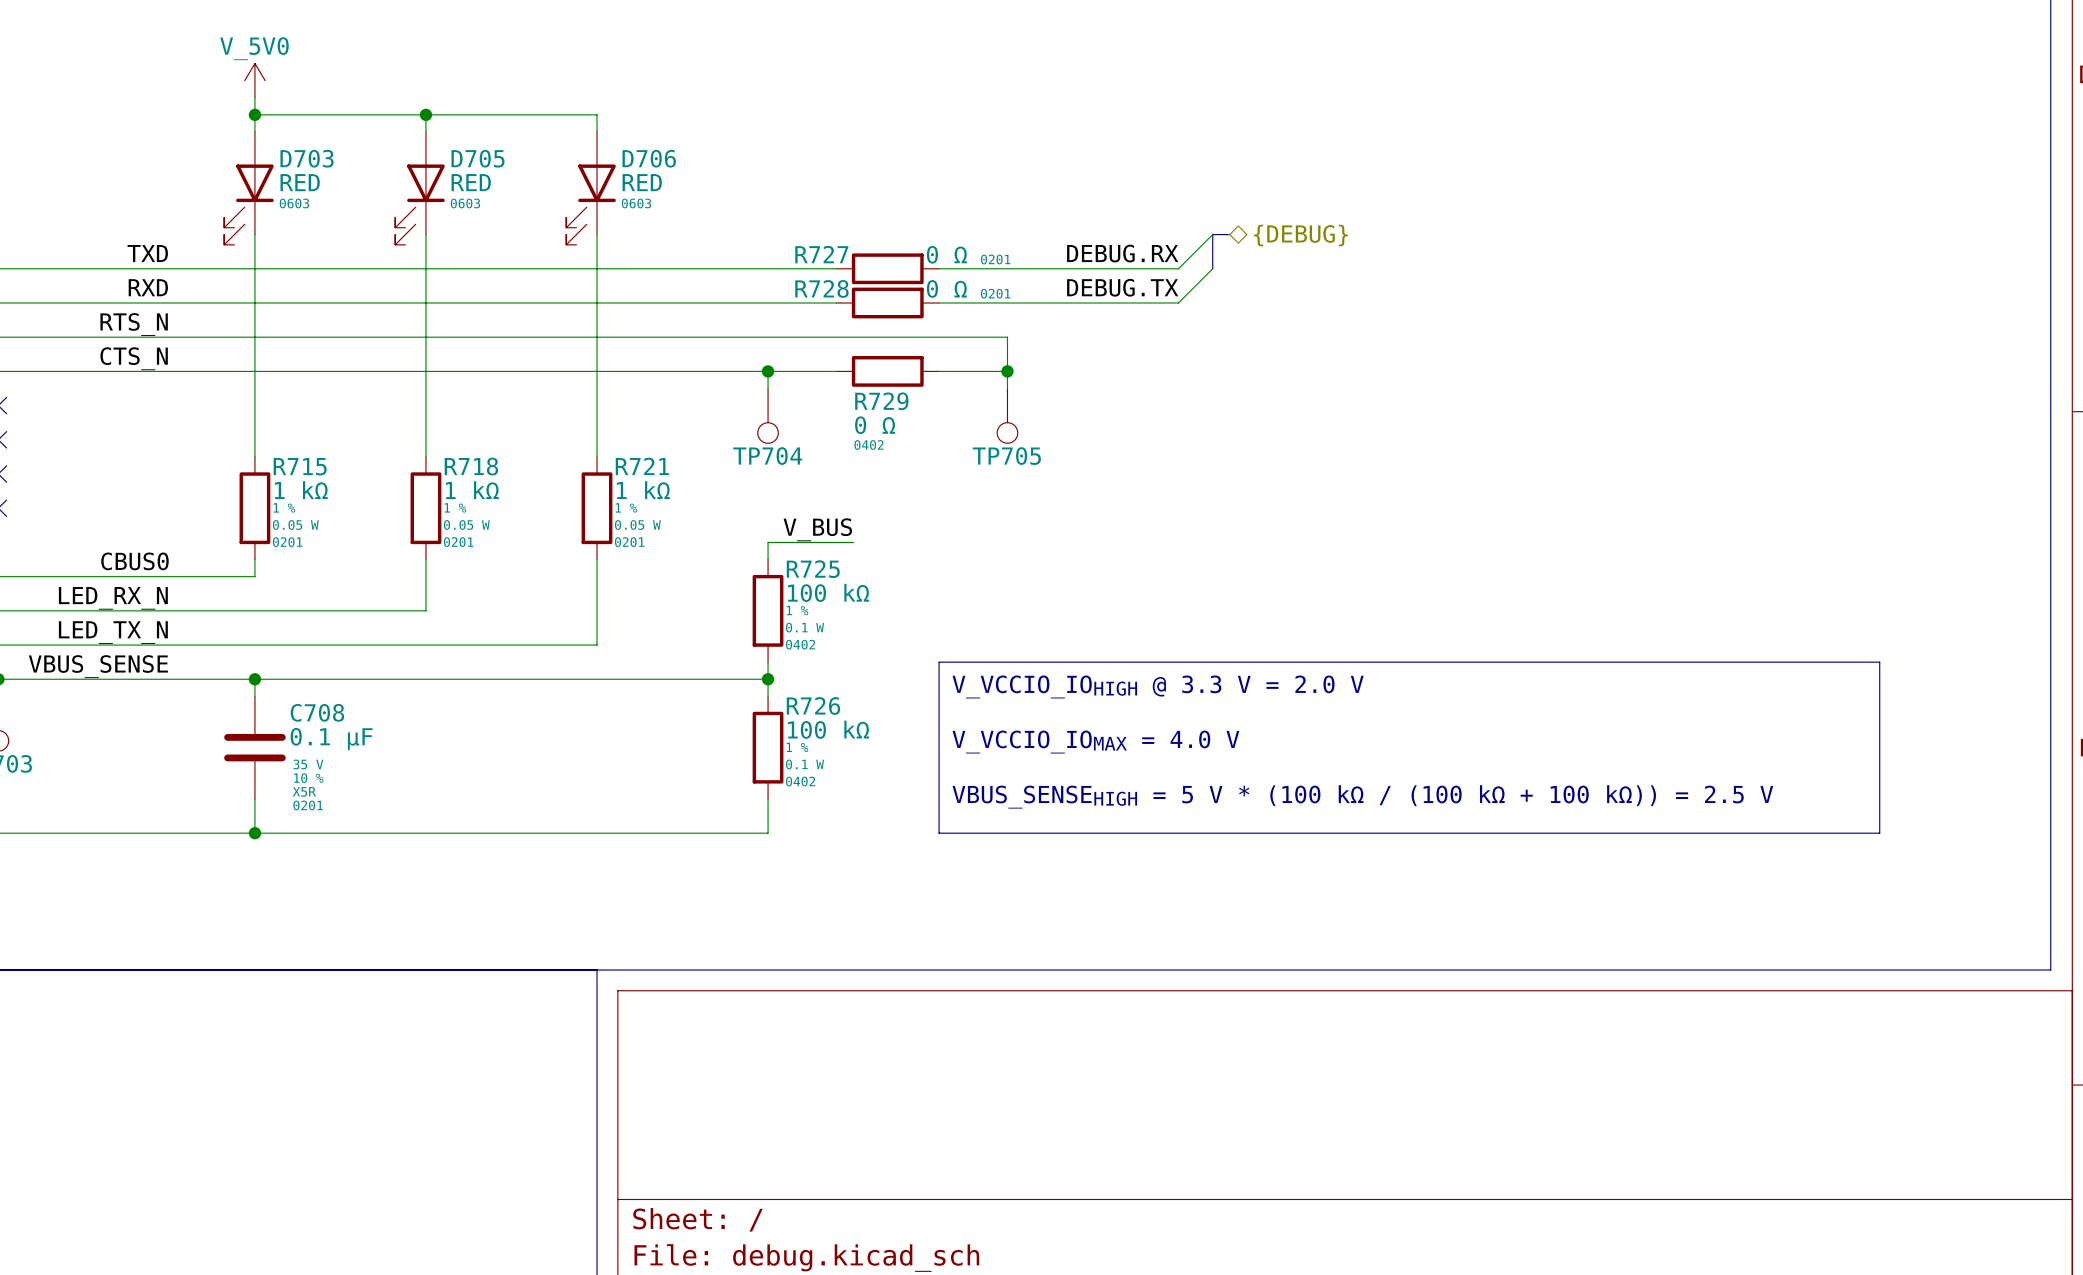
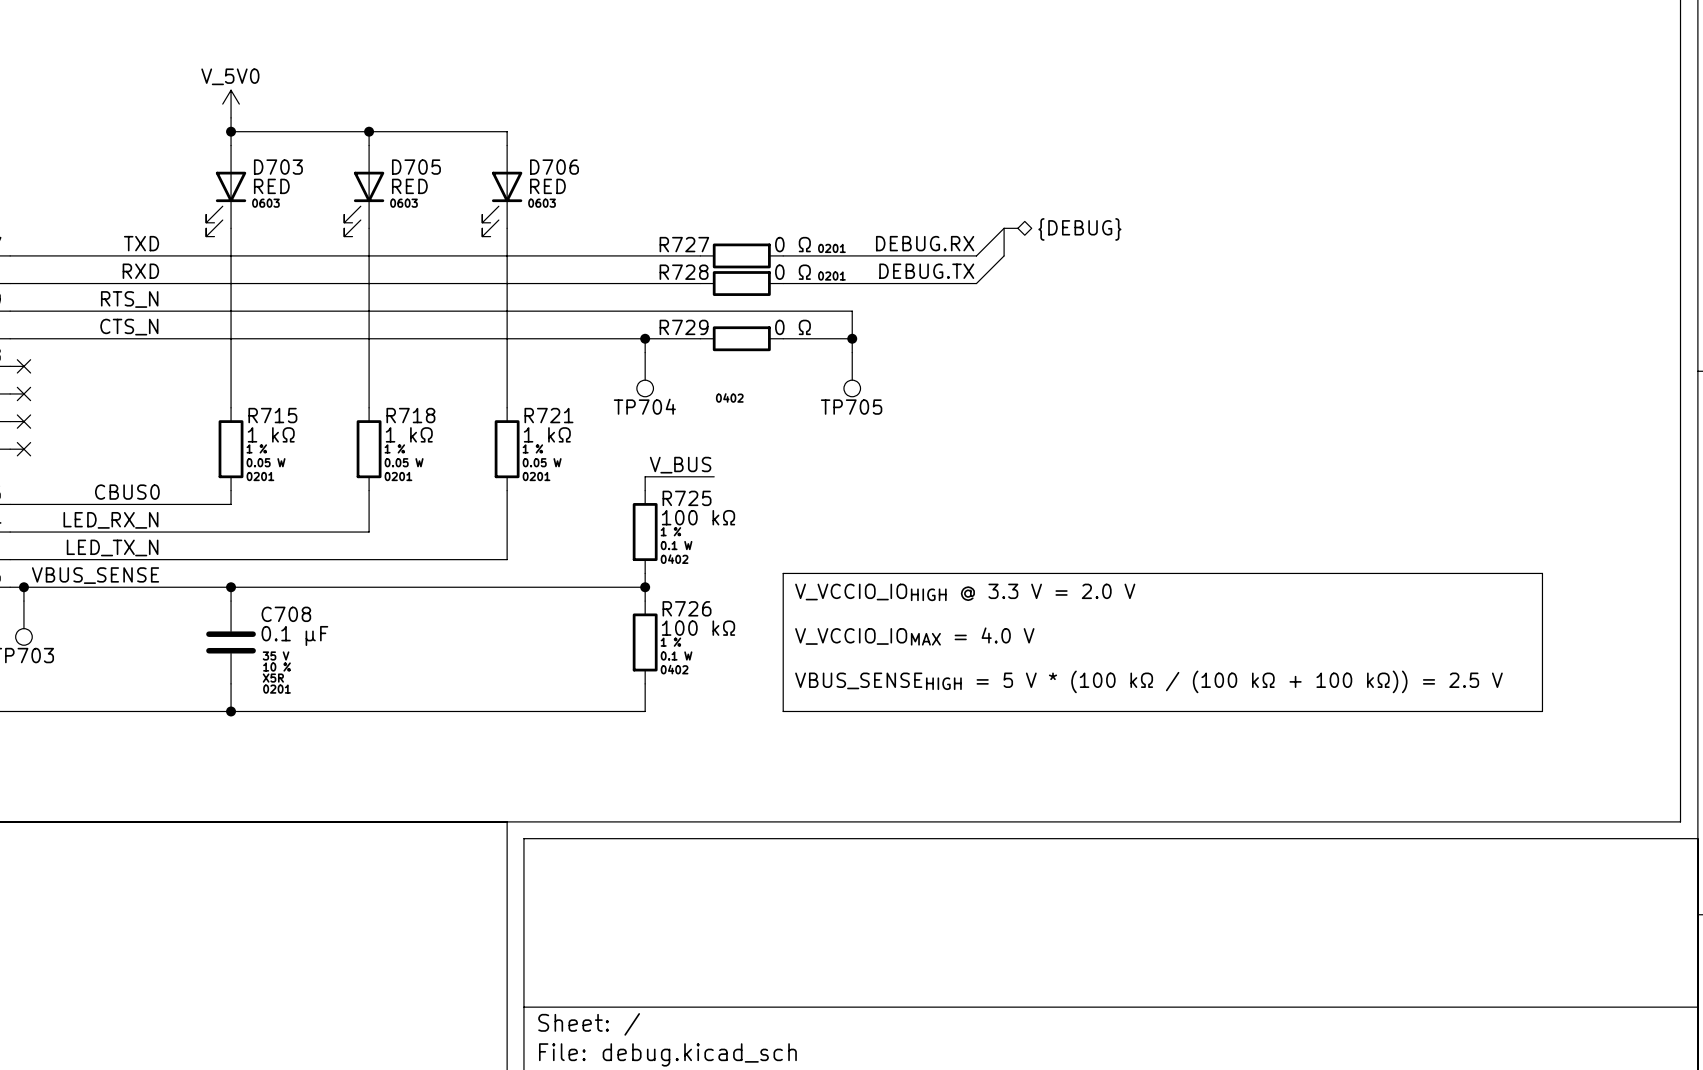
wire: (1007, 337) (1007, 388) -> (838, 311) (852, 311) (852, 352)
wire: none -> (838, 338) (852, 338)
junction position: (1007, 371) -> (852, 338)
R729 name position: R729 (881, 401) -> R729 (684, 327)
TP705 position: (1007, 415) -> (852, 374)
R729 value position: 0 Ω (875, 425) -> 0 Ω (792, 327)

